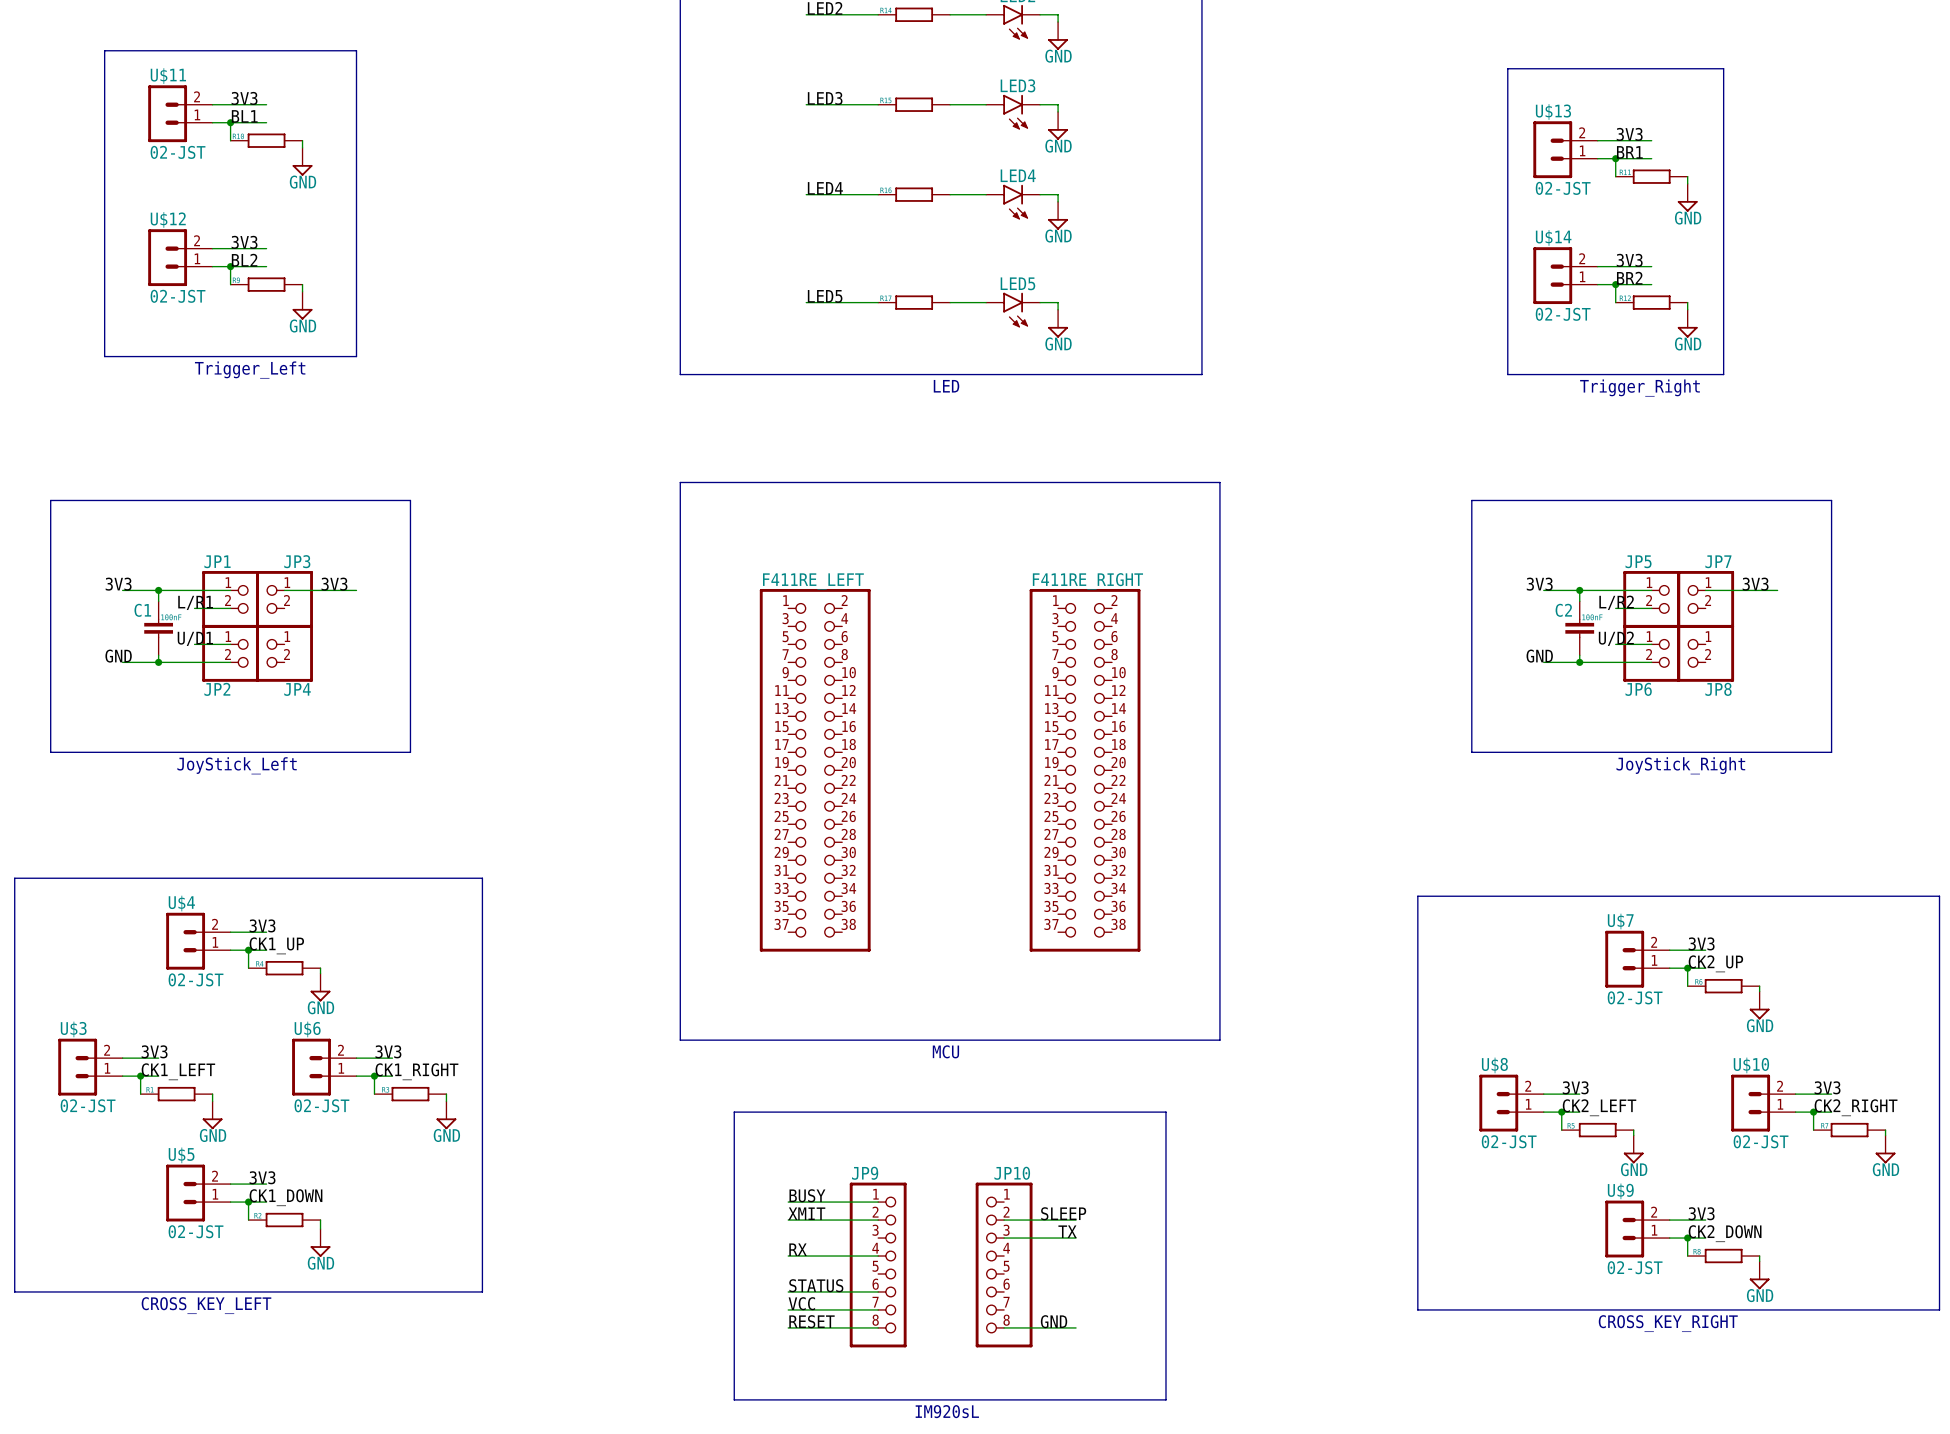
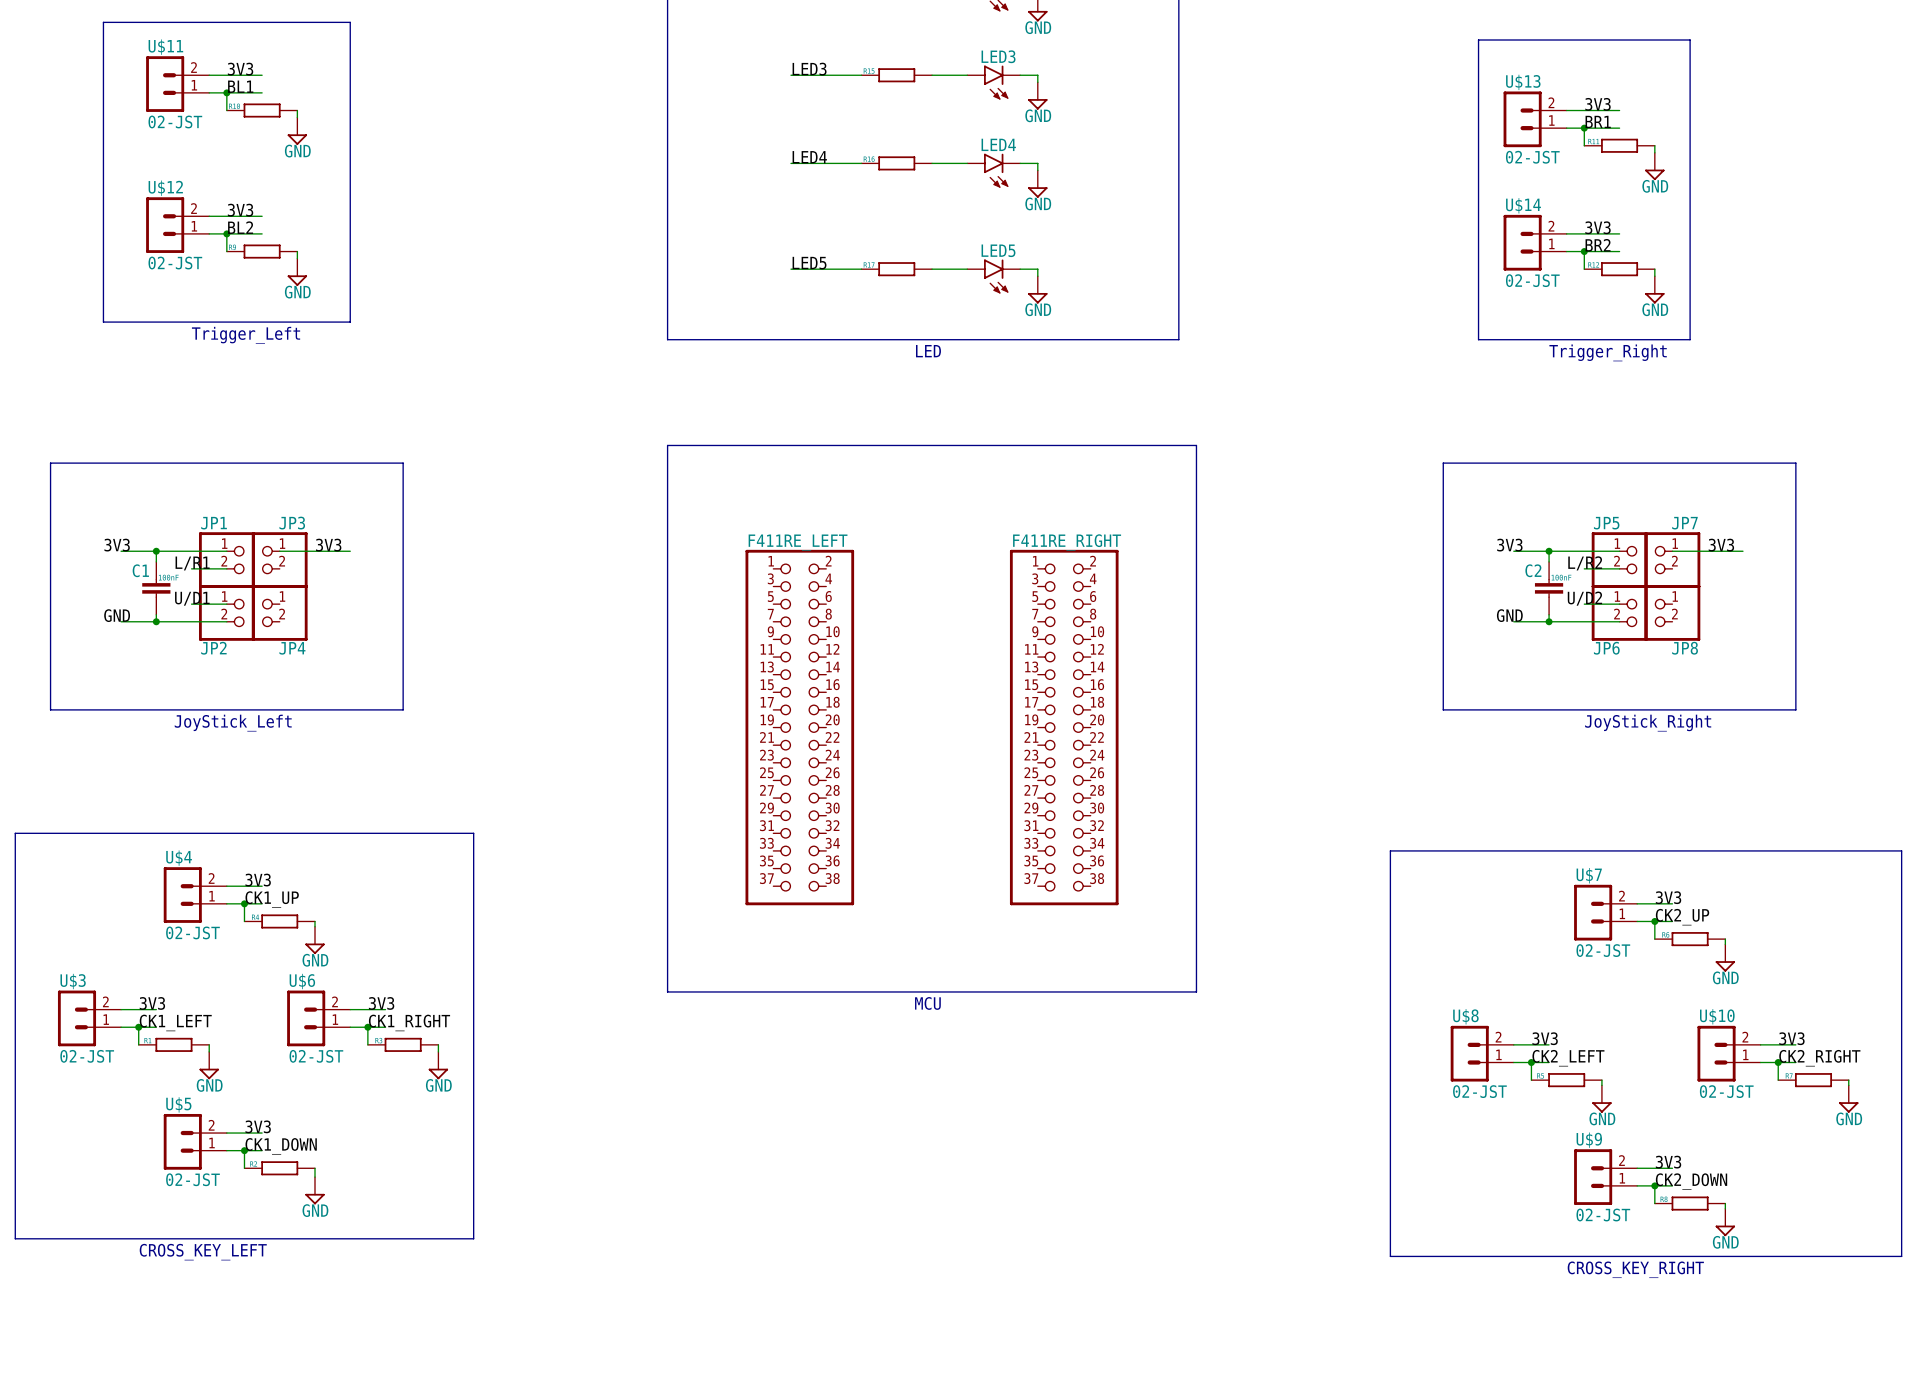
line: (734, 1112) (734, 1399) (1165, 1399) (1165, 1112) (734, 1112) -> none
label: BUSY (807, 1195) -> none
wire: (788, 1202) (878, 1202) -> none
label: XMIT (806, 1213) -> none
label: SLEEP (1063, 1213) -> none
wire: (788, 1220) (878, 1220) -> none
wire: (1004, 1220) (1076, 1220) -> none
label: TX (1067, 1231) -> none
wire: (1004, 1238) (1076, 1238) -> none
label: RX (798, 1249) -> none
wire: (788, 1256) (878, 1256) -> none
JP9: (878, 1265) -> none
JP10: (1004, 1265) -> none
label: STATUS (816, 1285) -> none
wire: (788, 1291) (878, 1291) -> none
label: VCC (801, 1303) -> none
wire: (788, 1309) (878, 1309) -> none
label: RESET (811, 1321) -> none
label: GND (1054, 1321) -> none
wire: (788, 1327) (878, 1327) -> none
wire: (1004, 1327) (1076, 1327) -> none
text: IM920sL (947, 1411) -> none

